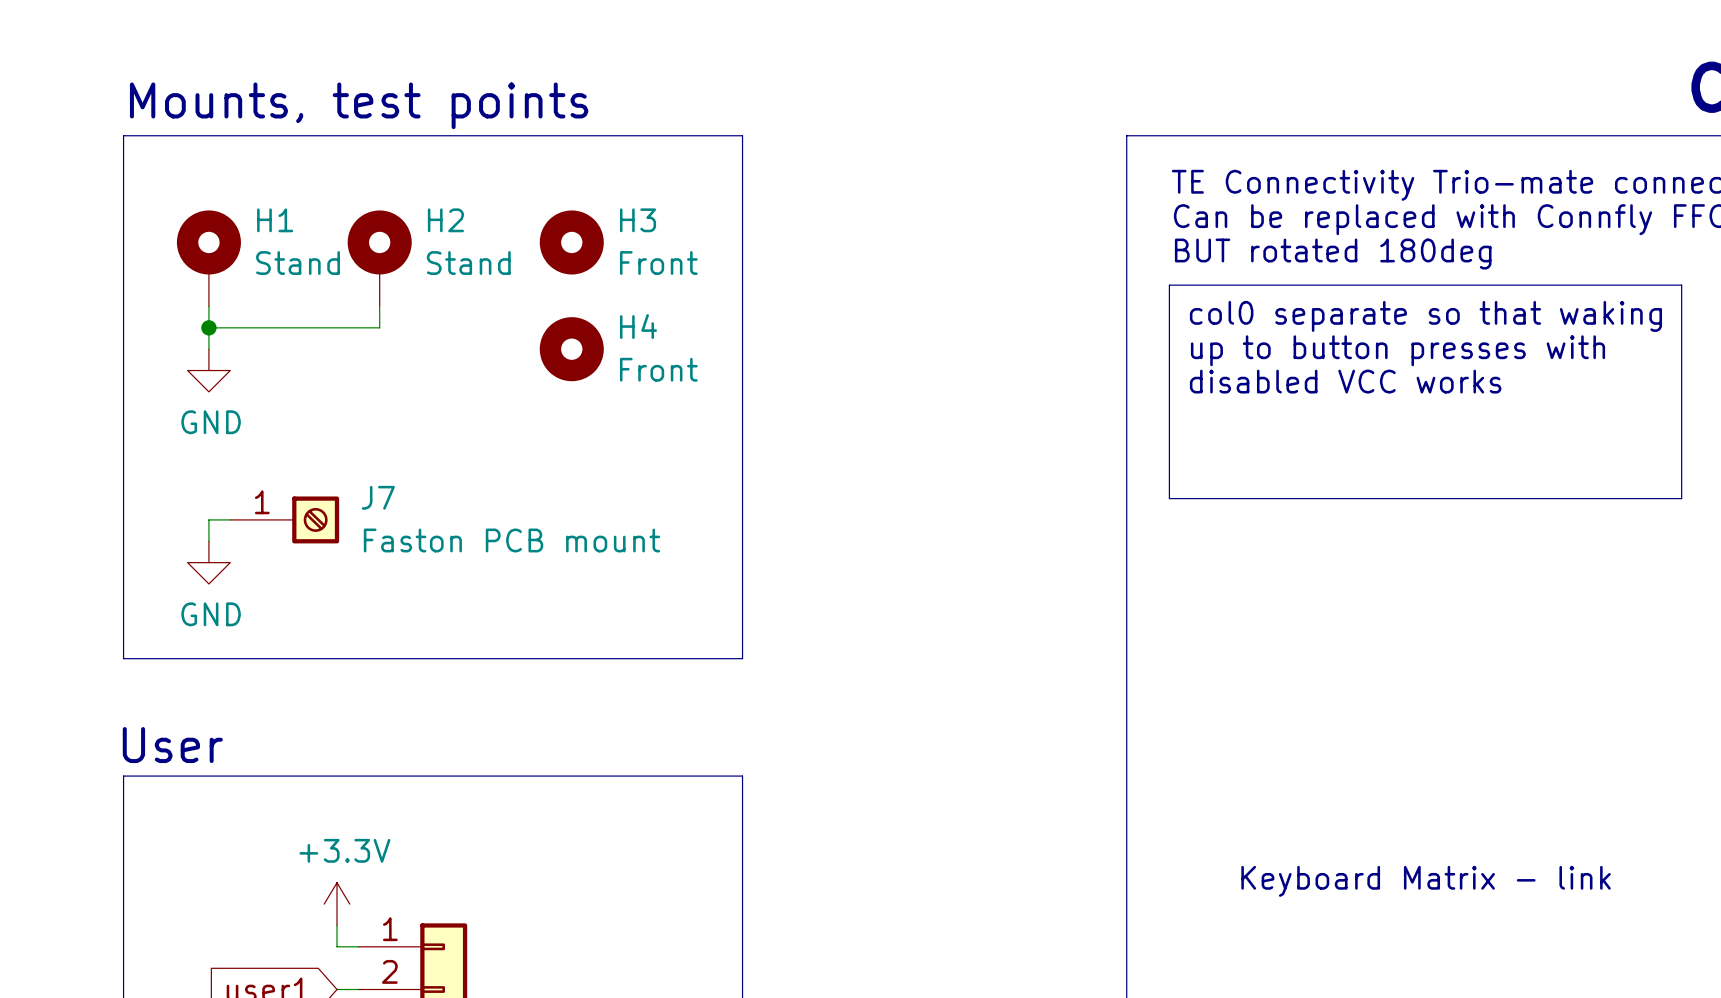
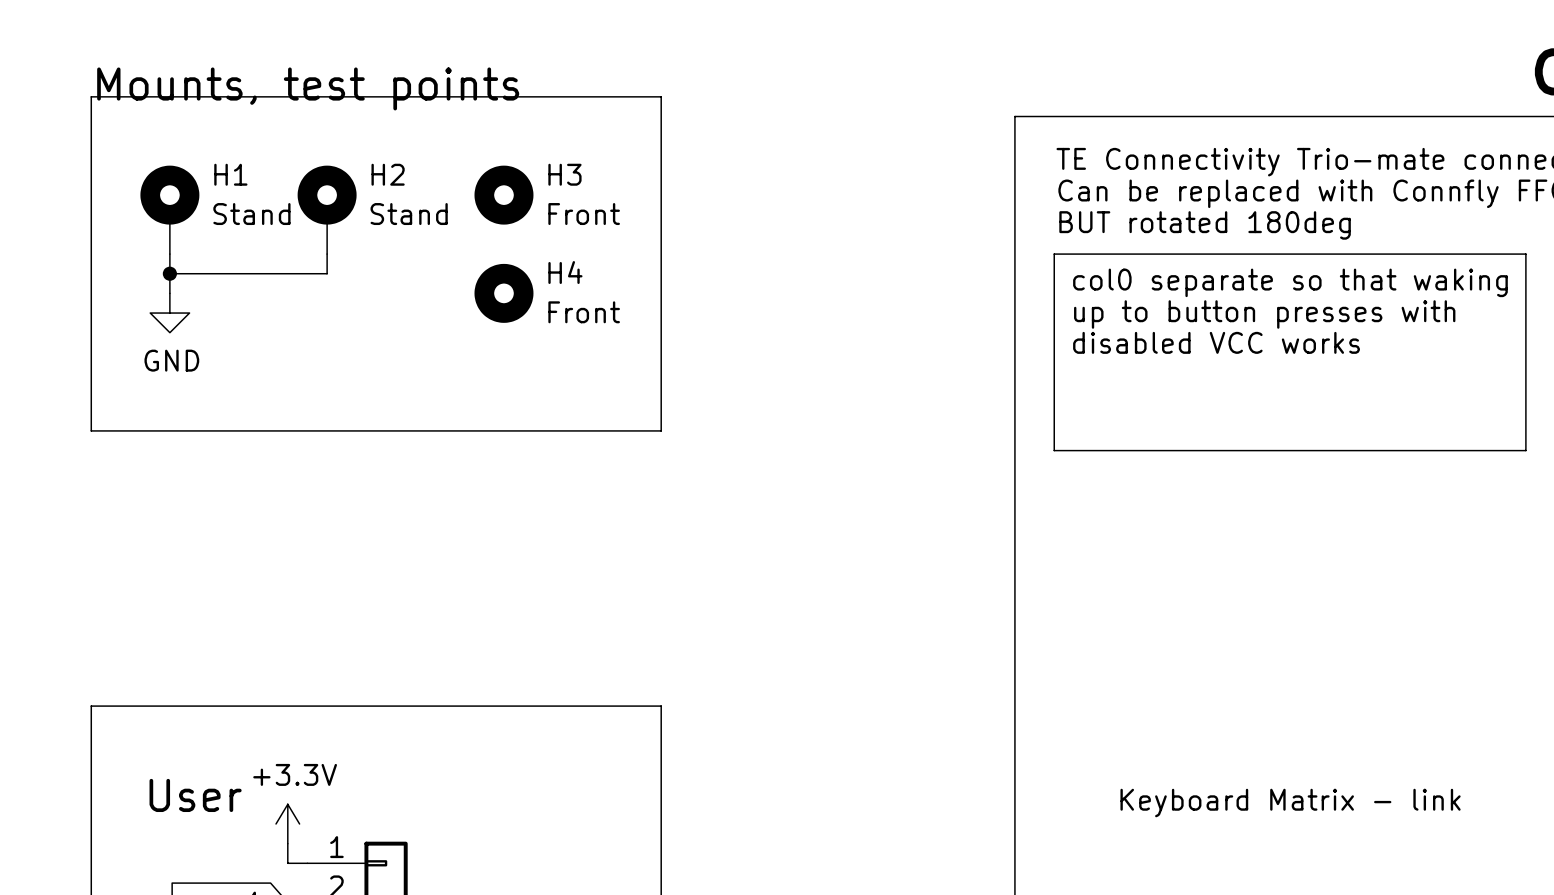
line: (123, 135) (742, 135) -> (91, 116) (91, 96) (661, 96) (661, 116)
H3 position: (571, 242) -> (503, 195)
H1 position: (208, 258) -> (169, 209)
H2 position: (379, 258) -> (327, 209)
wire: none -> (169, 254) (169, 273) (327, 273) (327, 254)
wire: (379, 306) (379, 327) (208, 327) (208, 349) -> none
junction position: (208, 327) -> (169, 273)
H4 position: (571, 349) -> (503, 293)
power symbol position: GND (208, 370) -> GND (169, 313)
line: (123, 477) (123, 658) (742, 658) (742, 477) -> (91, 430) (661, 430)
wire: (230, 519) (208, 519) (208, 541) -> none
J7: Faston PCB mount (284, 519) -> none
power symbol: GND (208, 562) -> none
text position: User (172, 745) -> User (195, 795)

